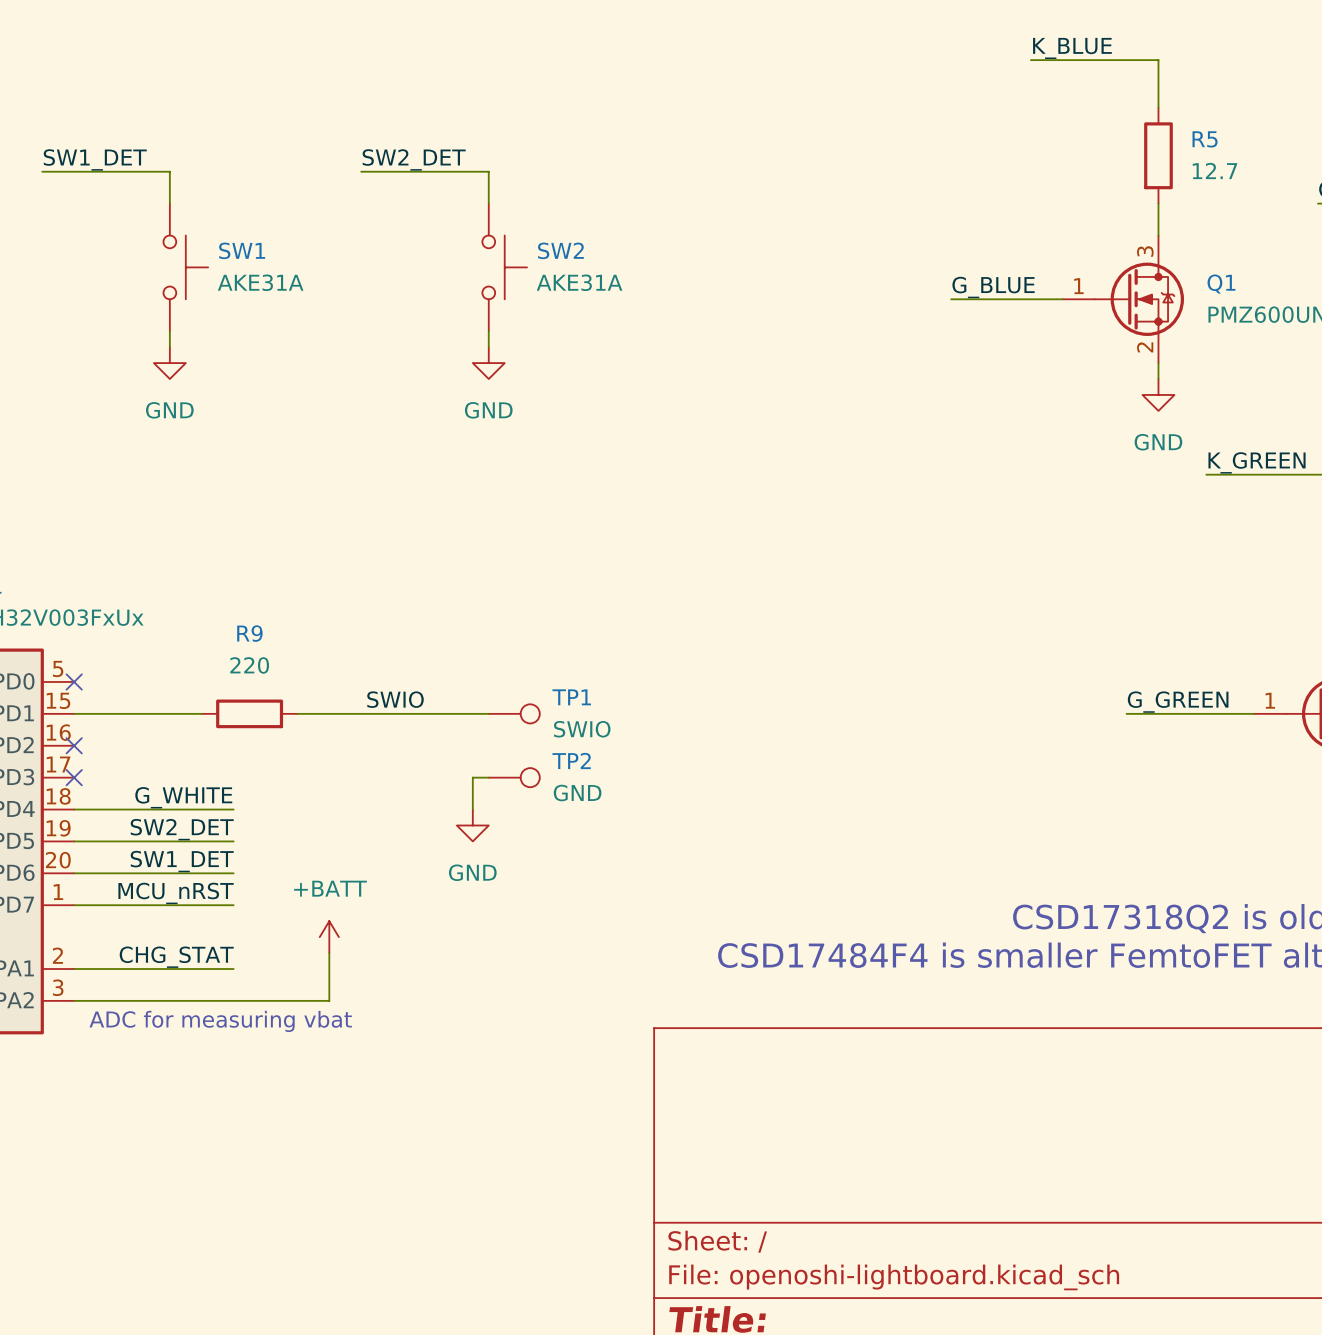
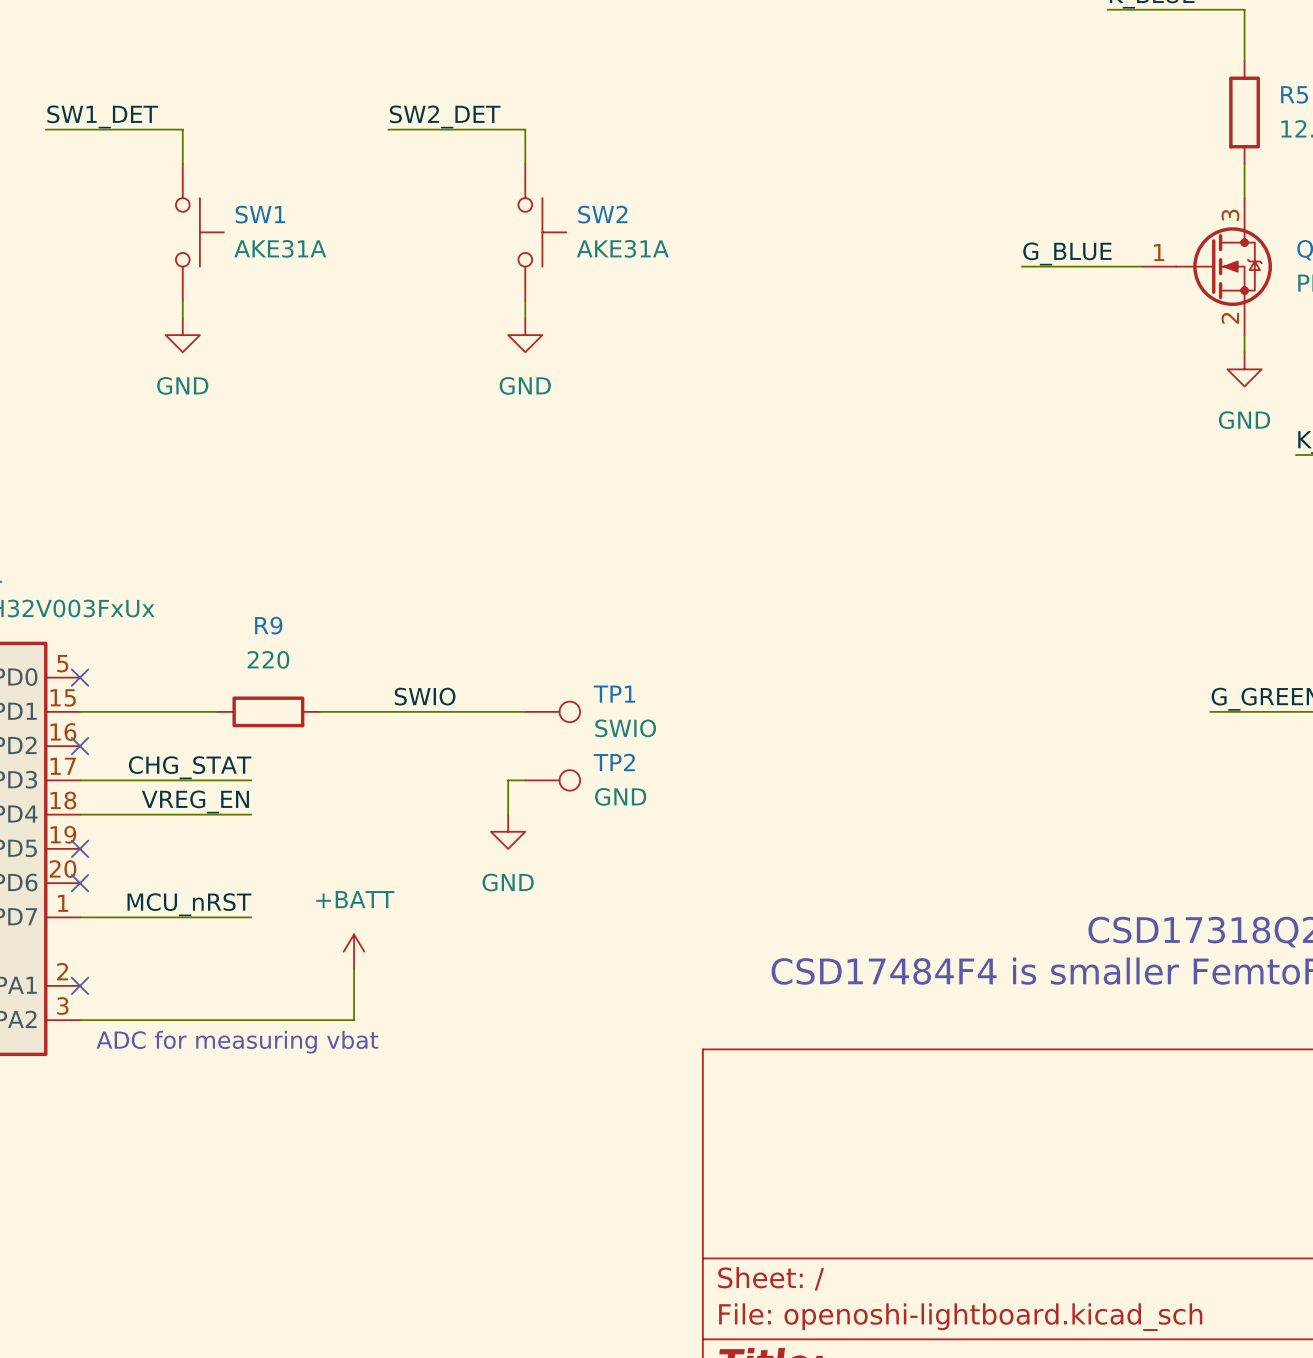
no-connect mark: (74, 777) -> none
label: G_WHITE (183, 797) -> VREG_EN (195, 801)
label: SW2_DET (182, 829) -> none
wire: (74, 841) (233, 841) -> (80, 780) (251, 780)
no-connect mark: none -> (80, 848)
label: SW1_DET (182, 861) -> none
wire: (74, 873) (233, 873) -> none
no-connect mark: none -> (80, 883)
label position: CHG_STAT (176, 957) -> CHG_STAT (190, 767)
wire: (74, 969) (233, 969) -> none
no-connect mark: none -> (80, 985)

